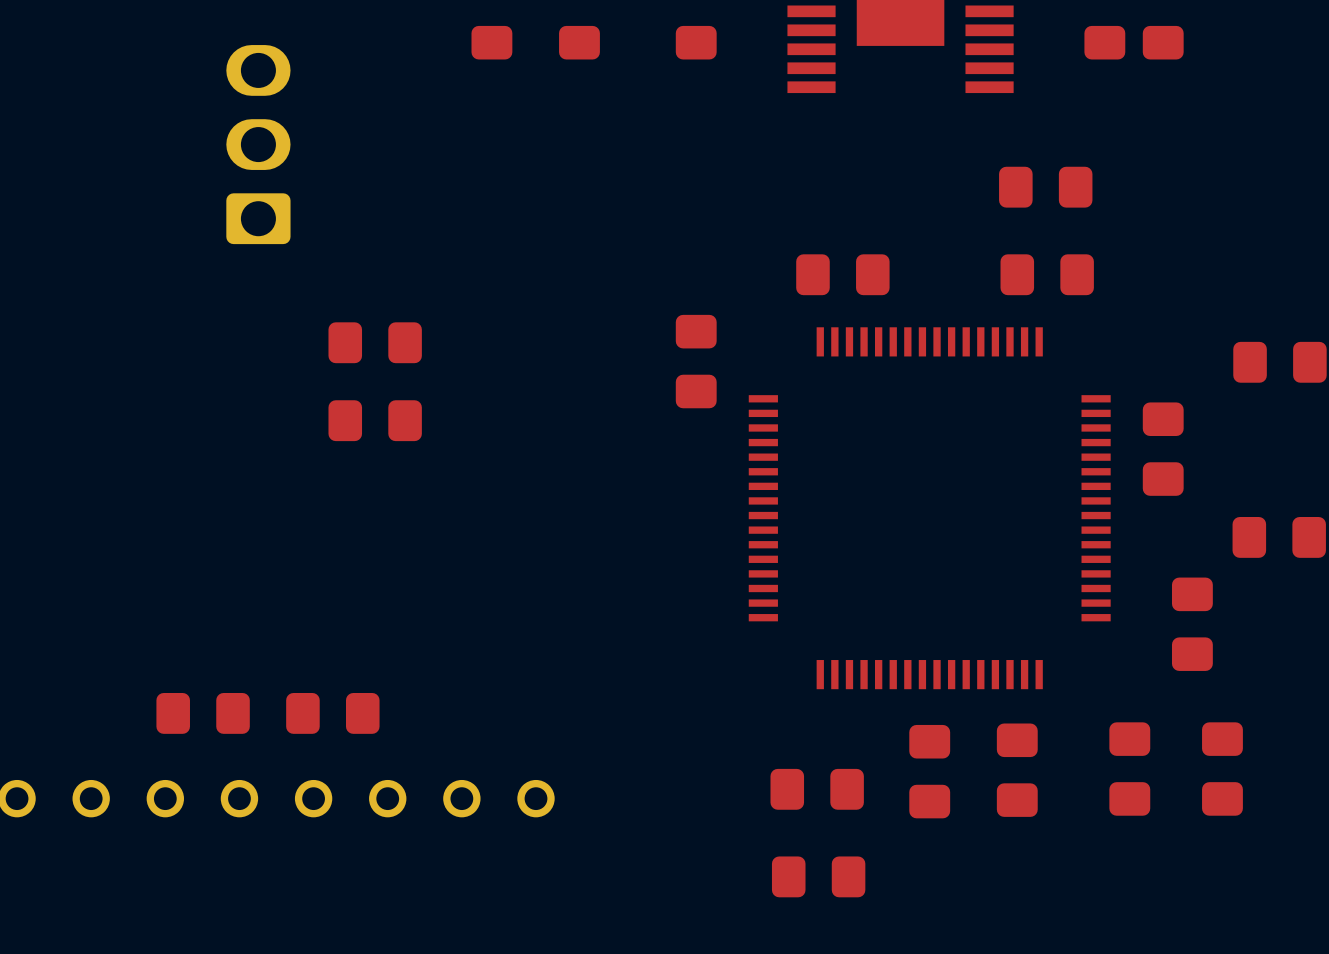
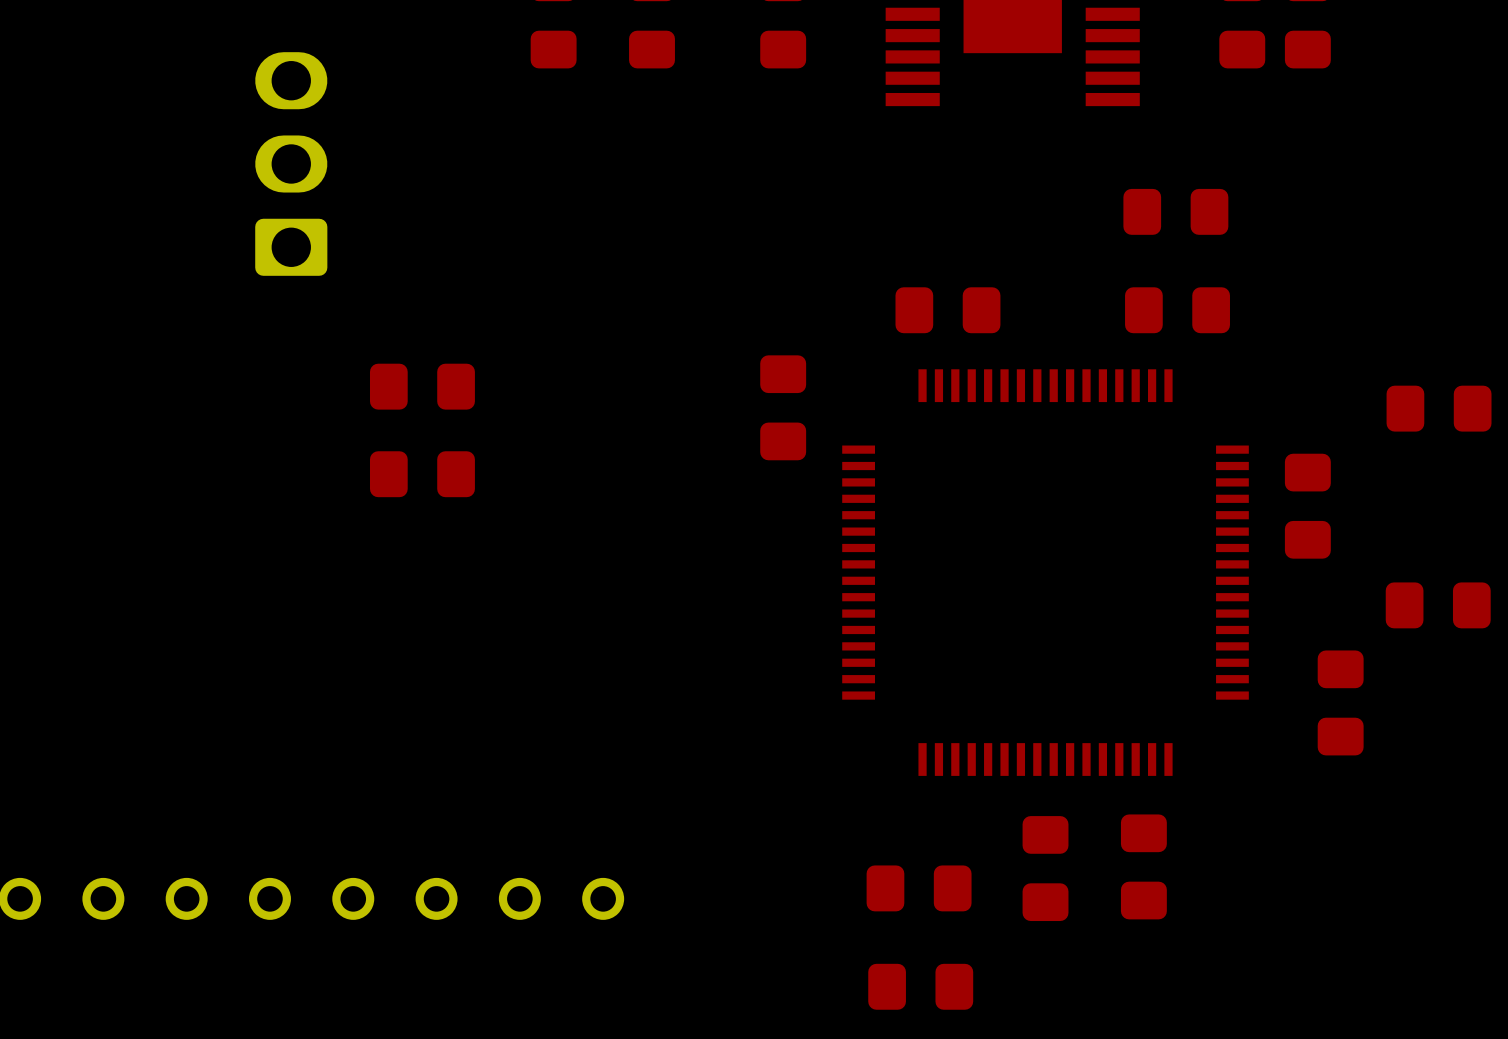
part: (203, 713) -> none
part: (332, 713) -> none
part: (1129, 769) -> none
part: (1222, 769) -> none

